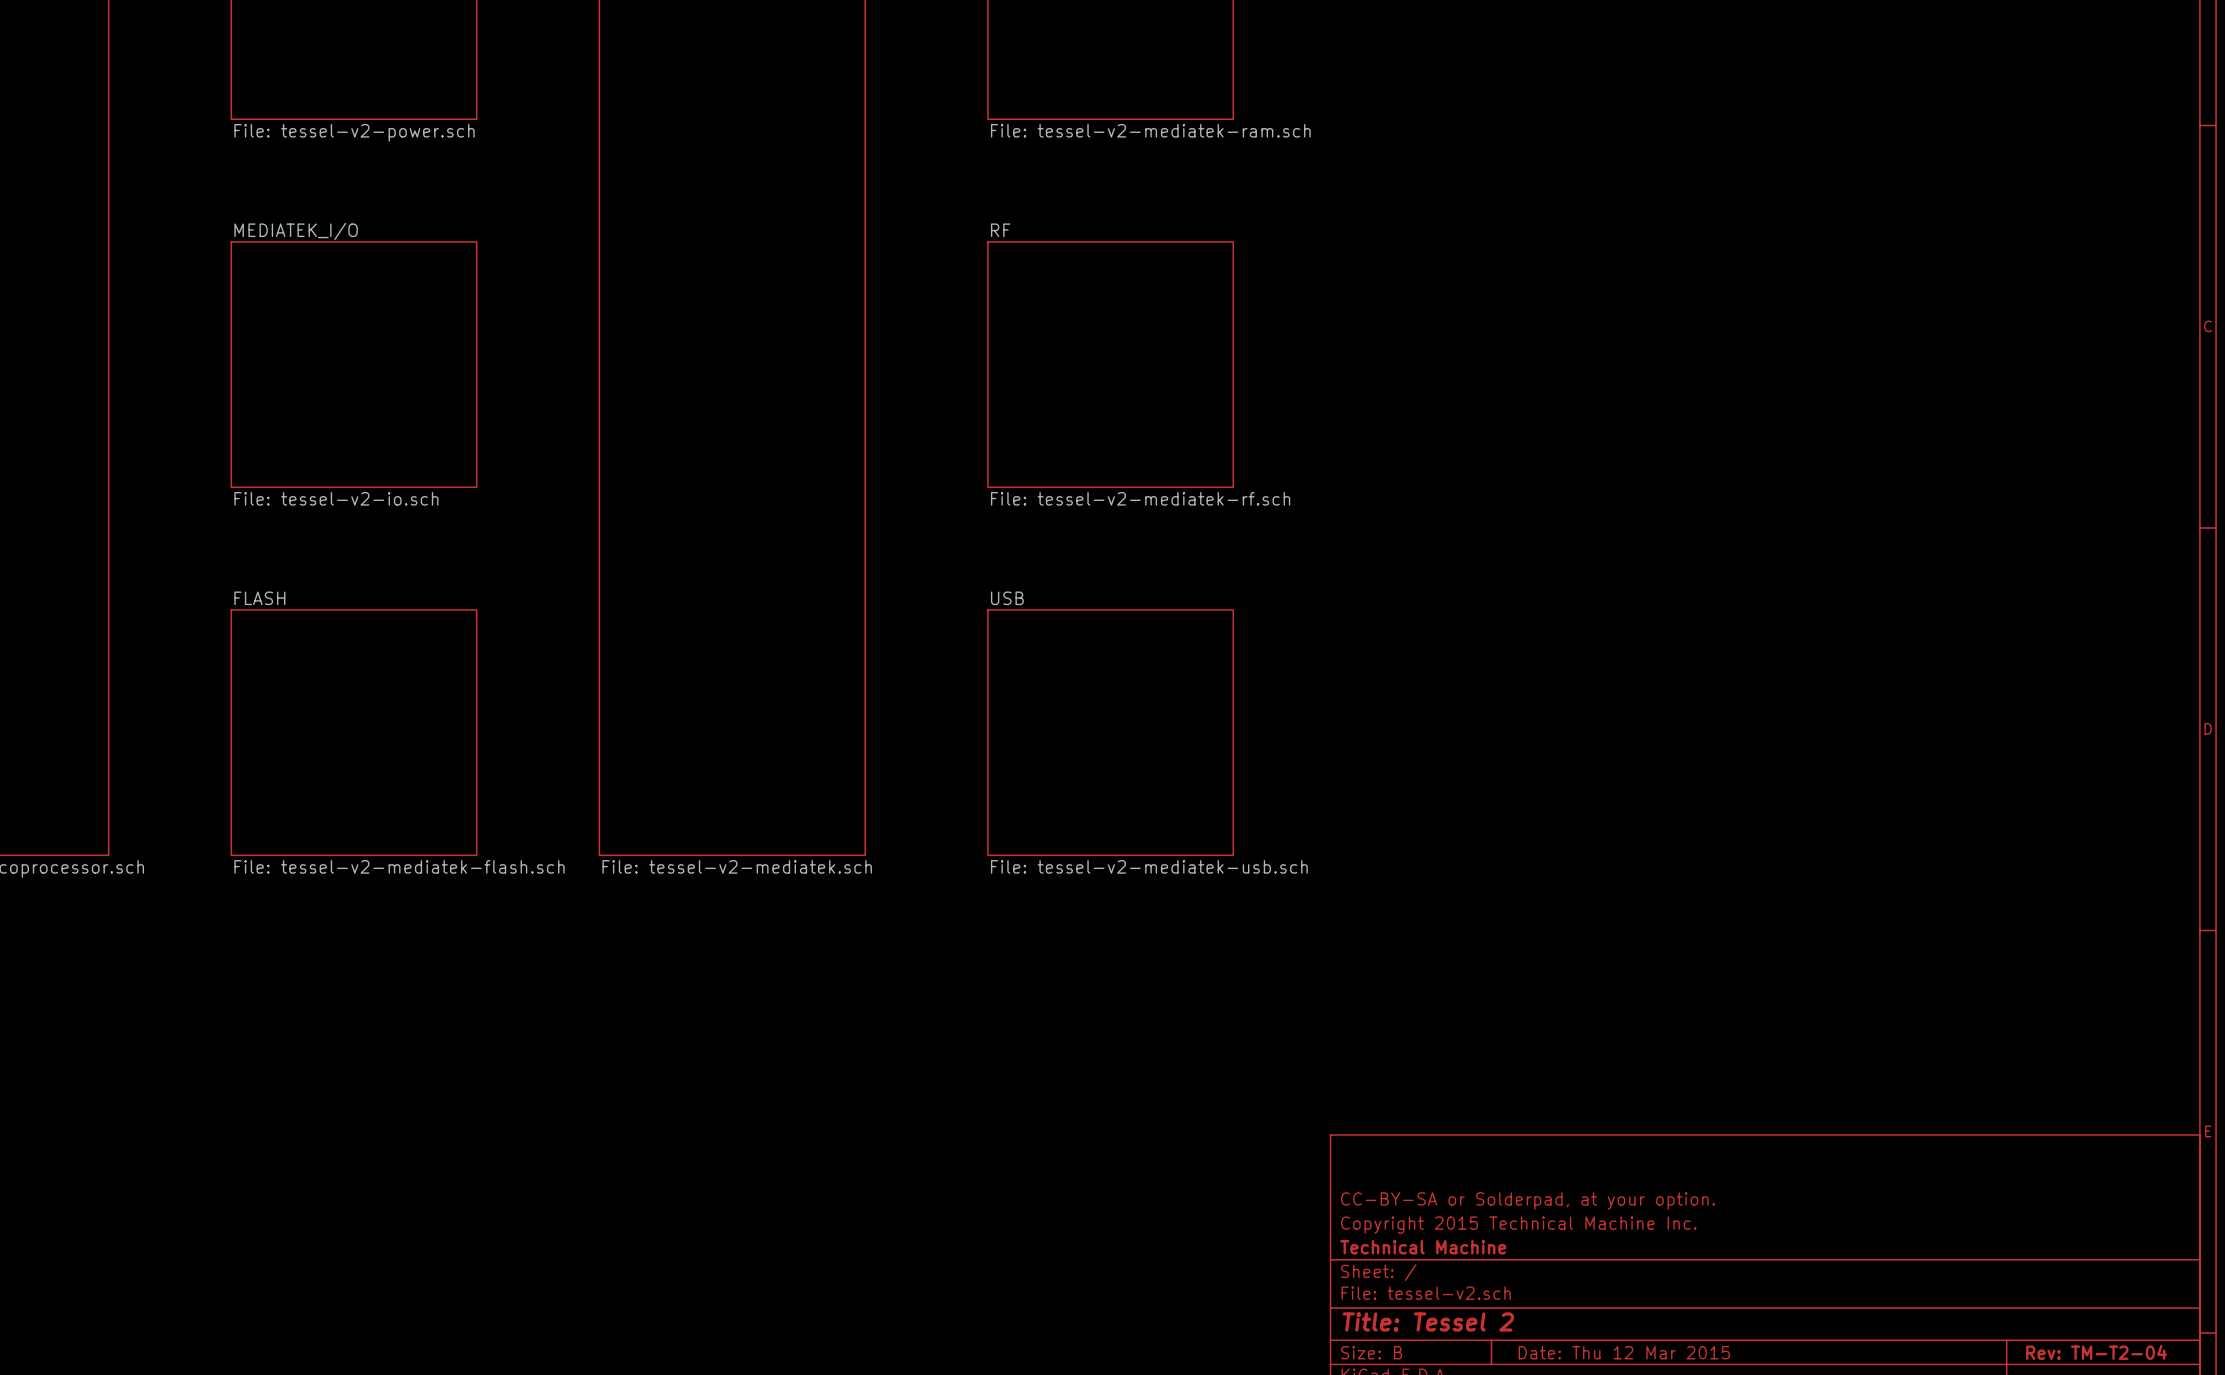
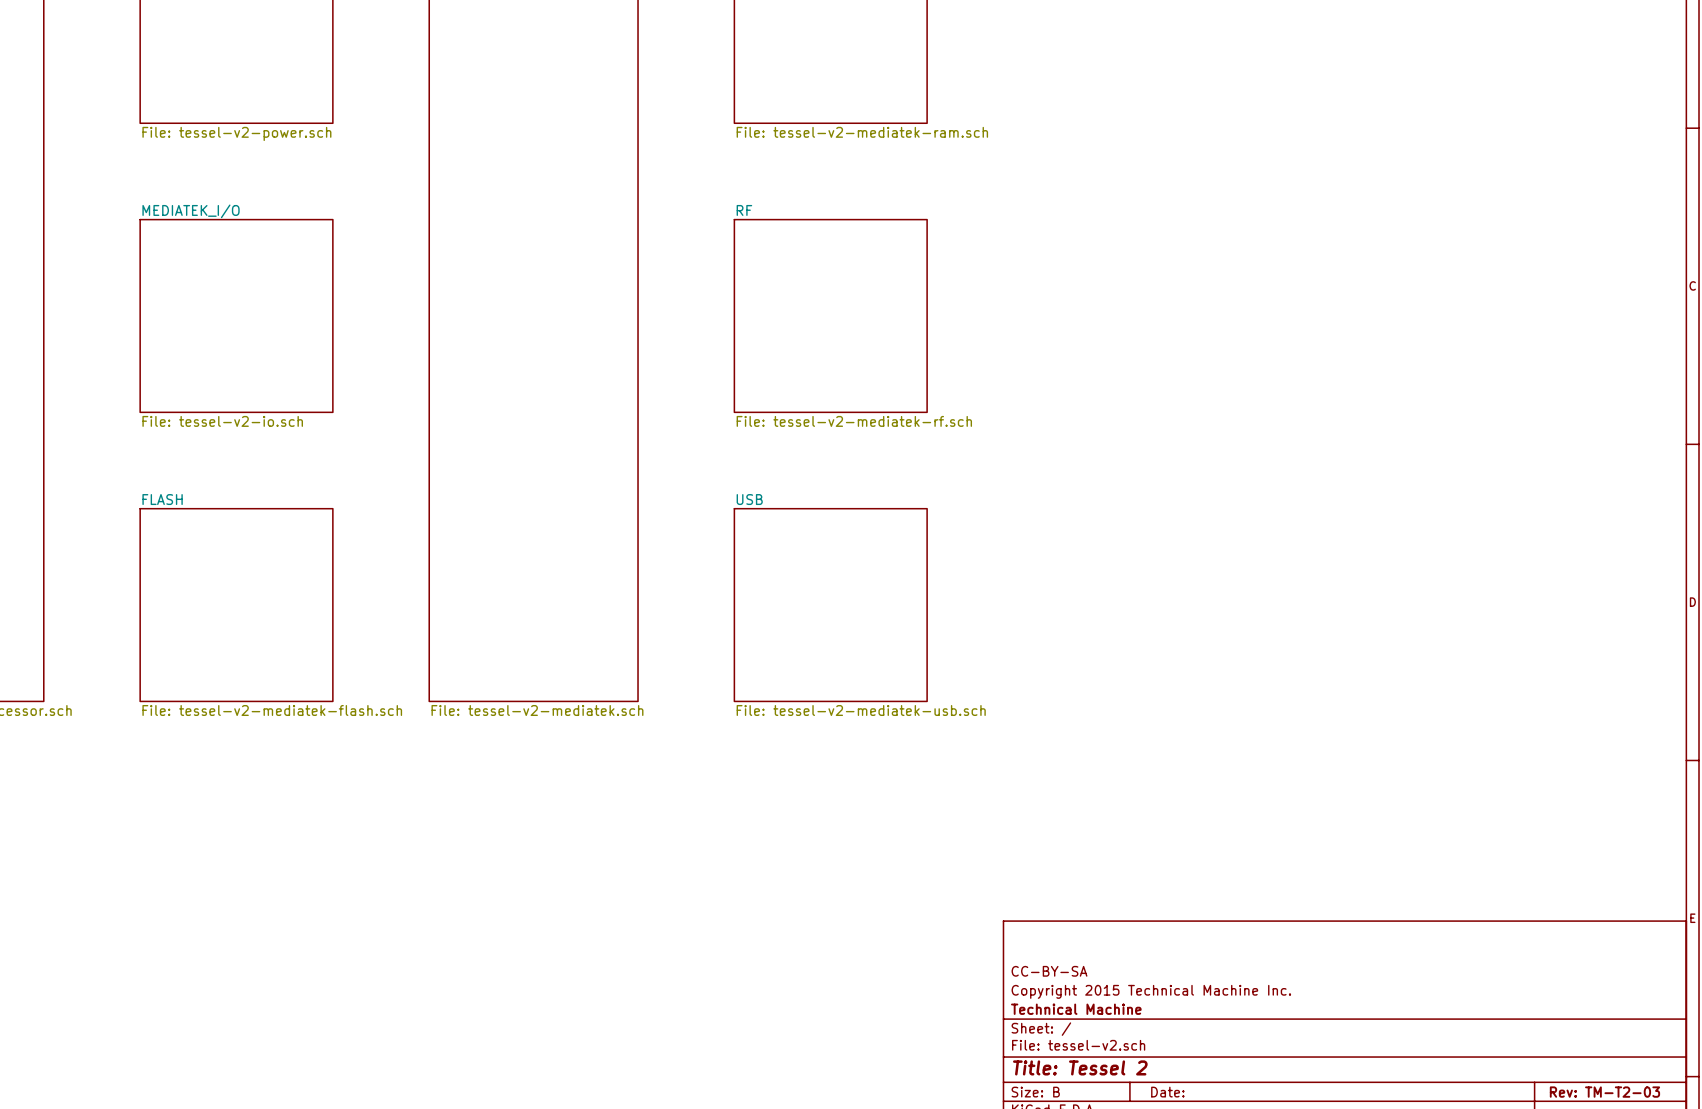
title block: CC-BY-SA or Solderpad, at your option. (1527, 1200) -> CC-BY-SA (1049, 971)
title block: Date: Thu 12 Mar 2015 (1624, 1352) -> Date: (1167, 1092)
title block: Rev: TM-T2-04 (2096, 1352) -> Rev: TM-T2-03 (1604, 1092)

